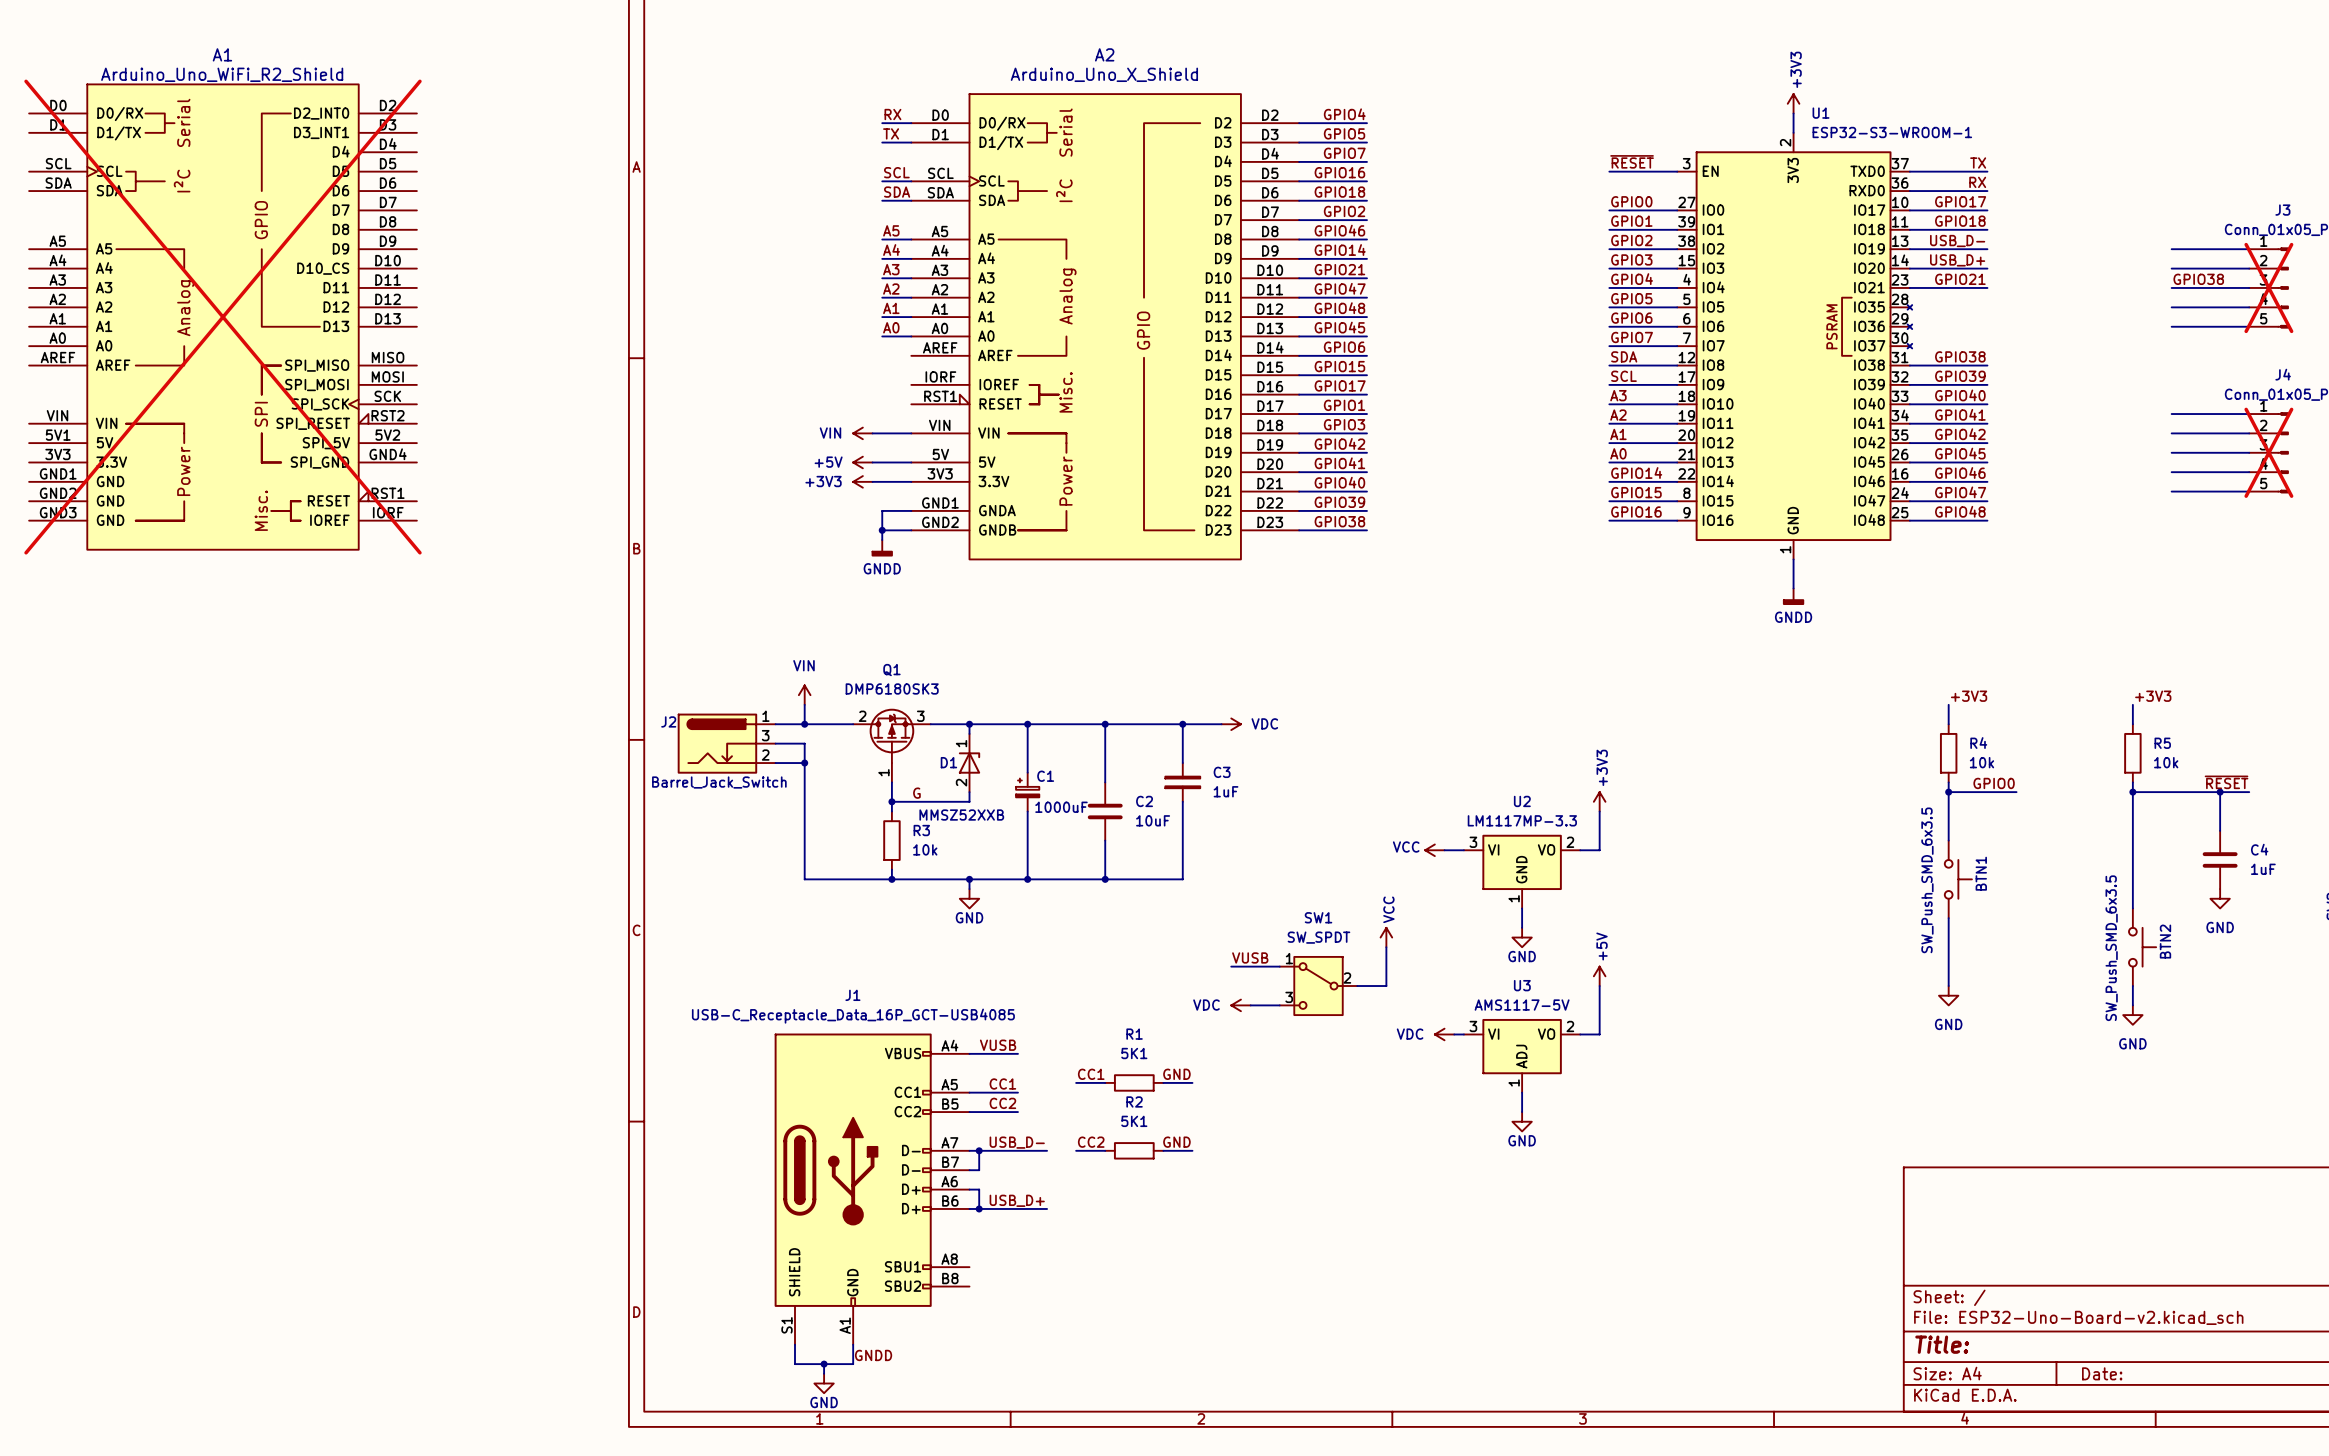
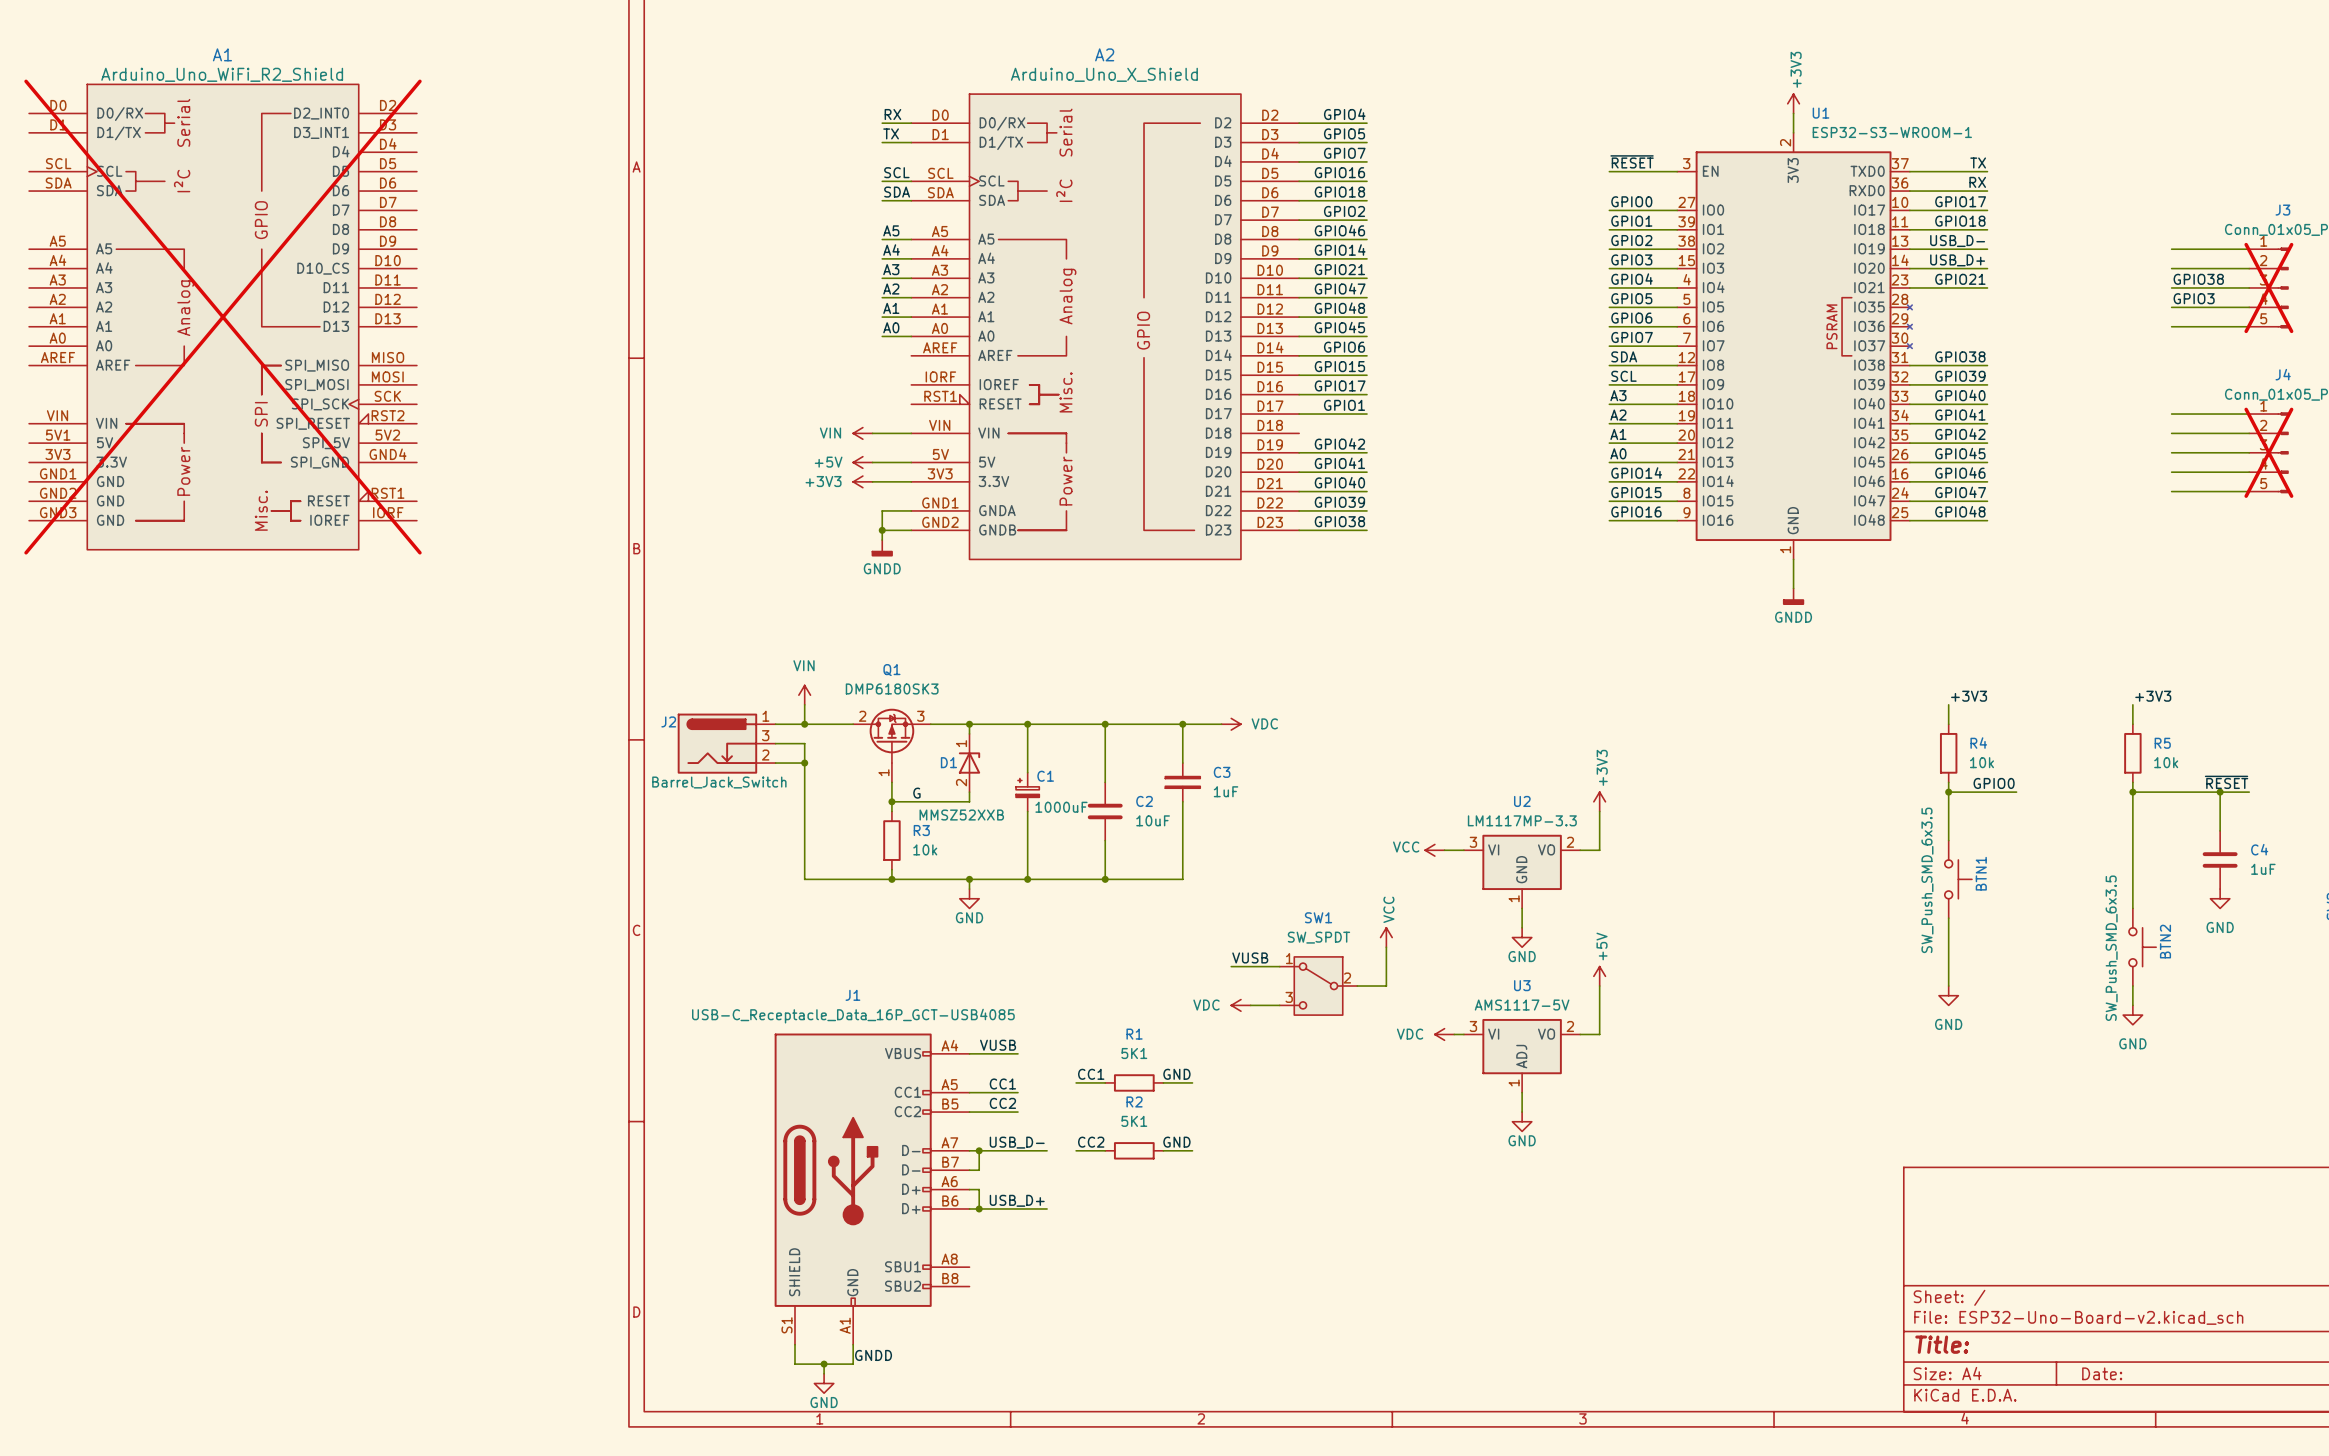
label: none -> GPIO3 (2194, 298)
label: GPIO3 (1344, 424) -> none
wire: (1299, 433) (1366, 433) -> none

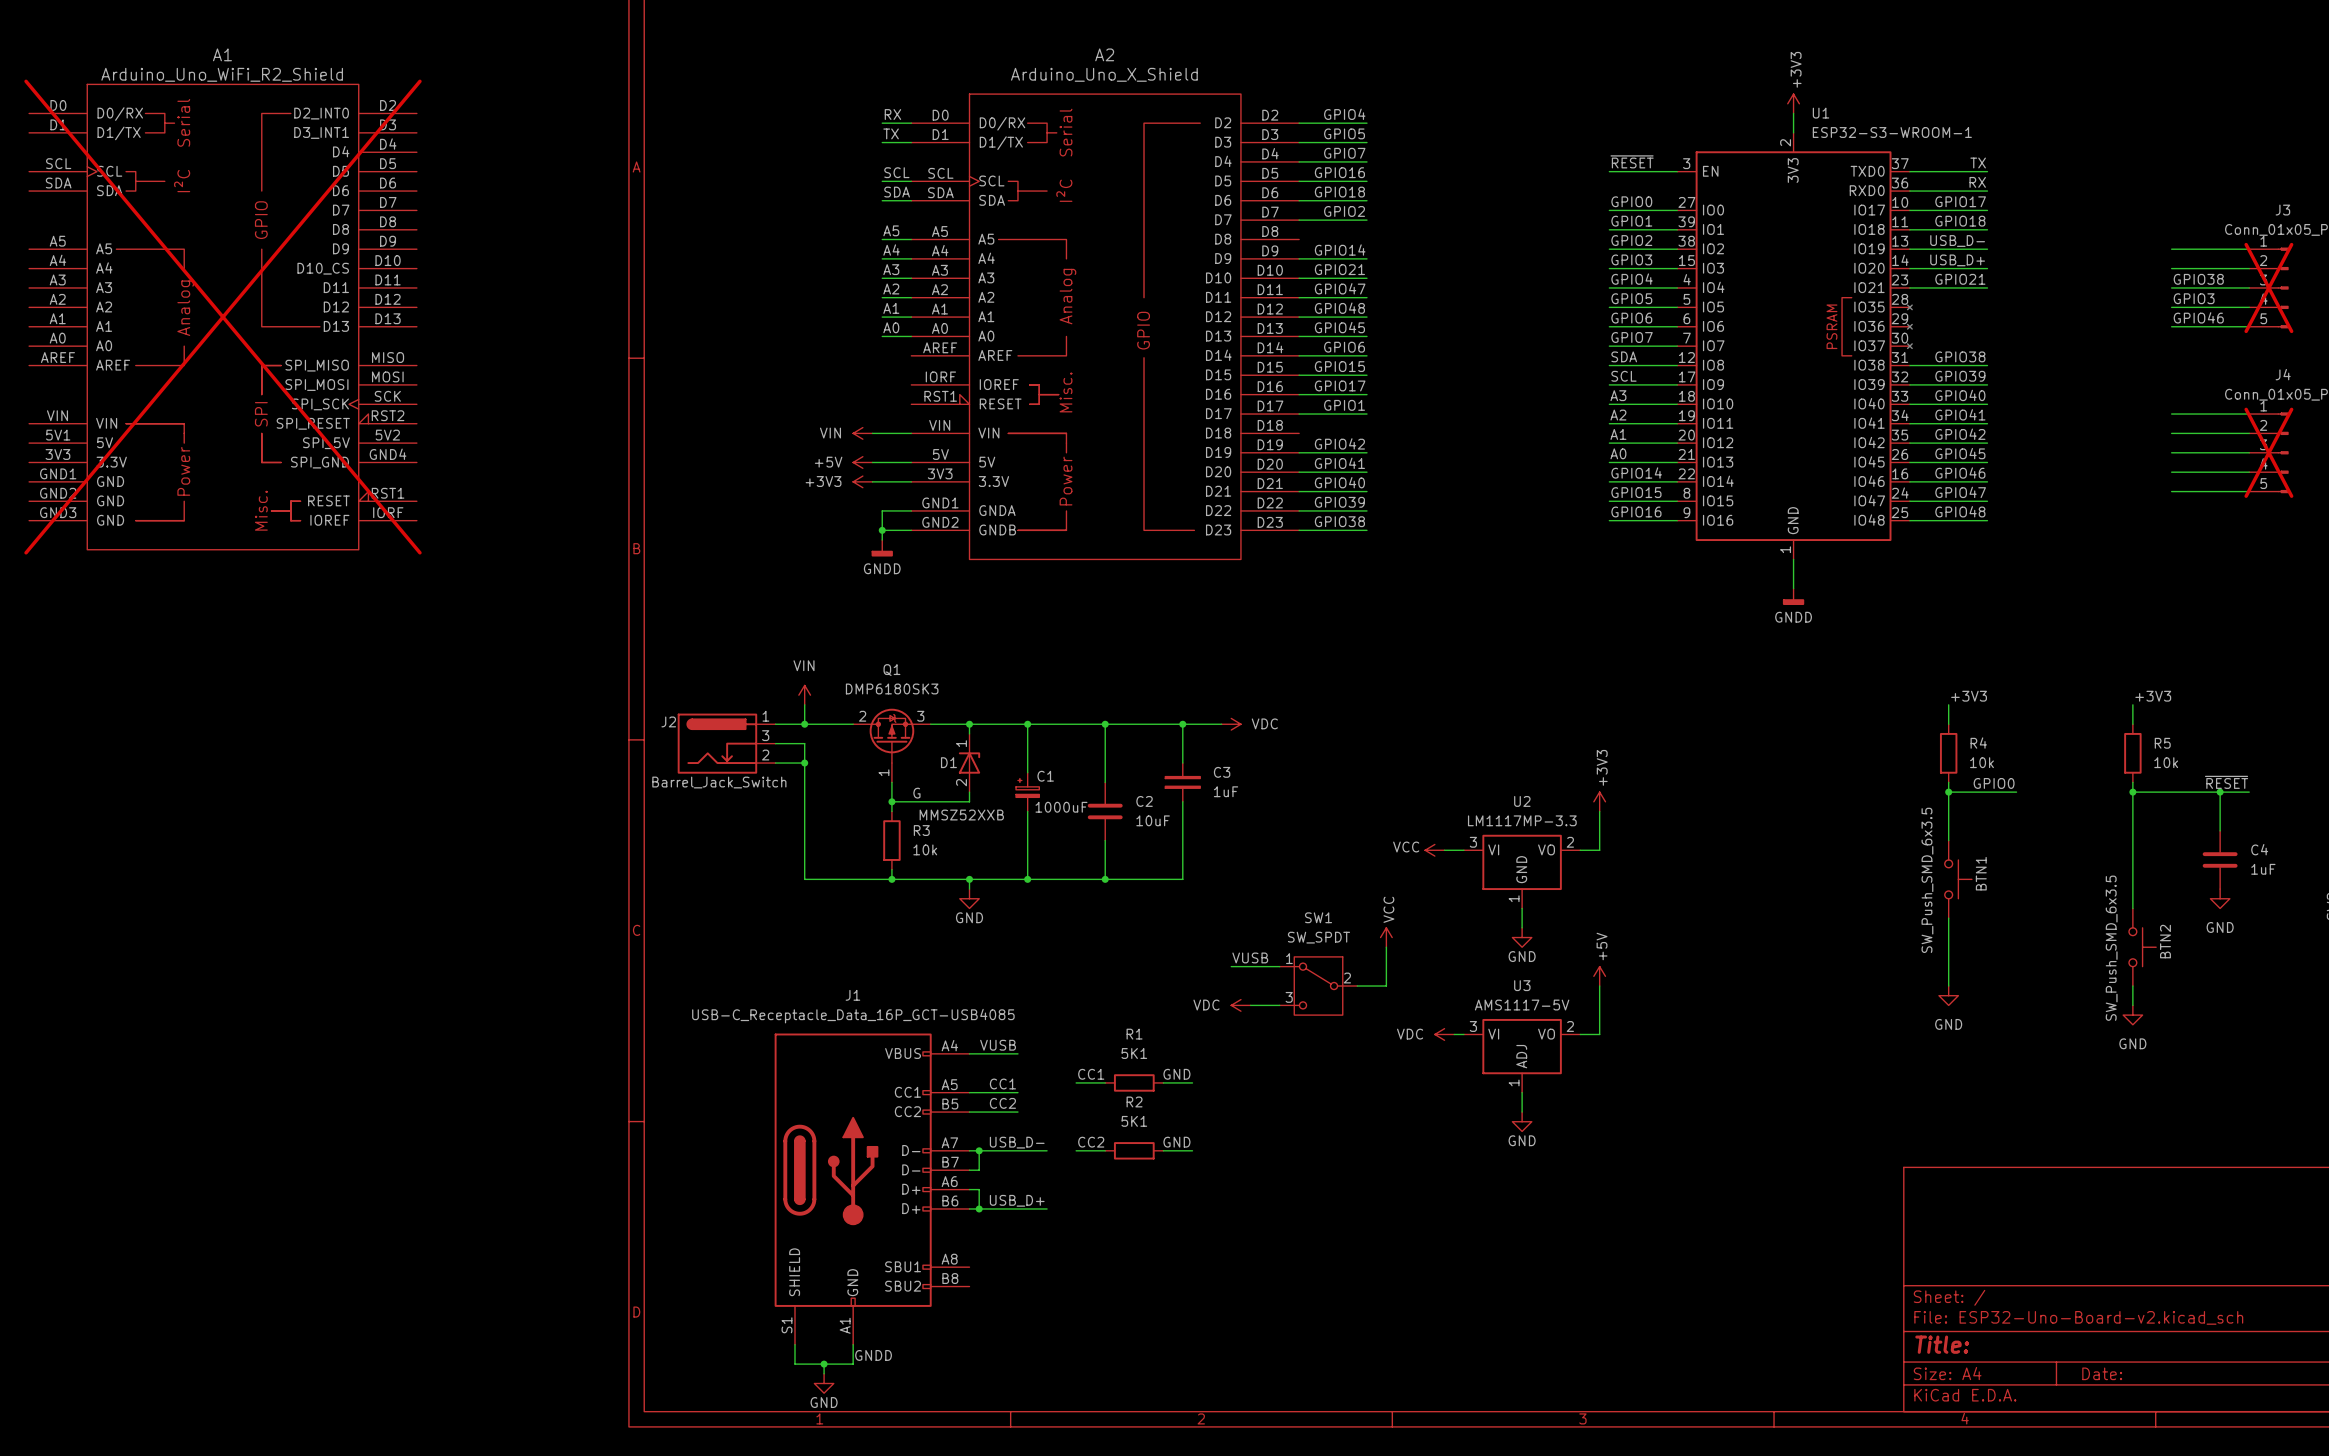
label: GPIO46 (1339, 230) -> none
wire: (1299, 239) (1366, 239) -> none
label: none -> GPIO46 (2198, 317)

